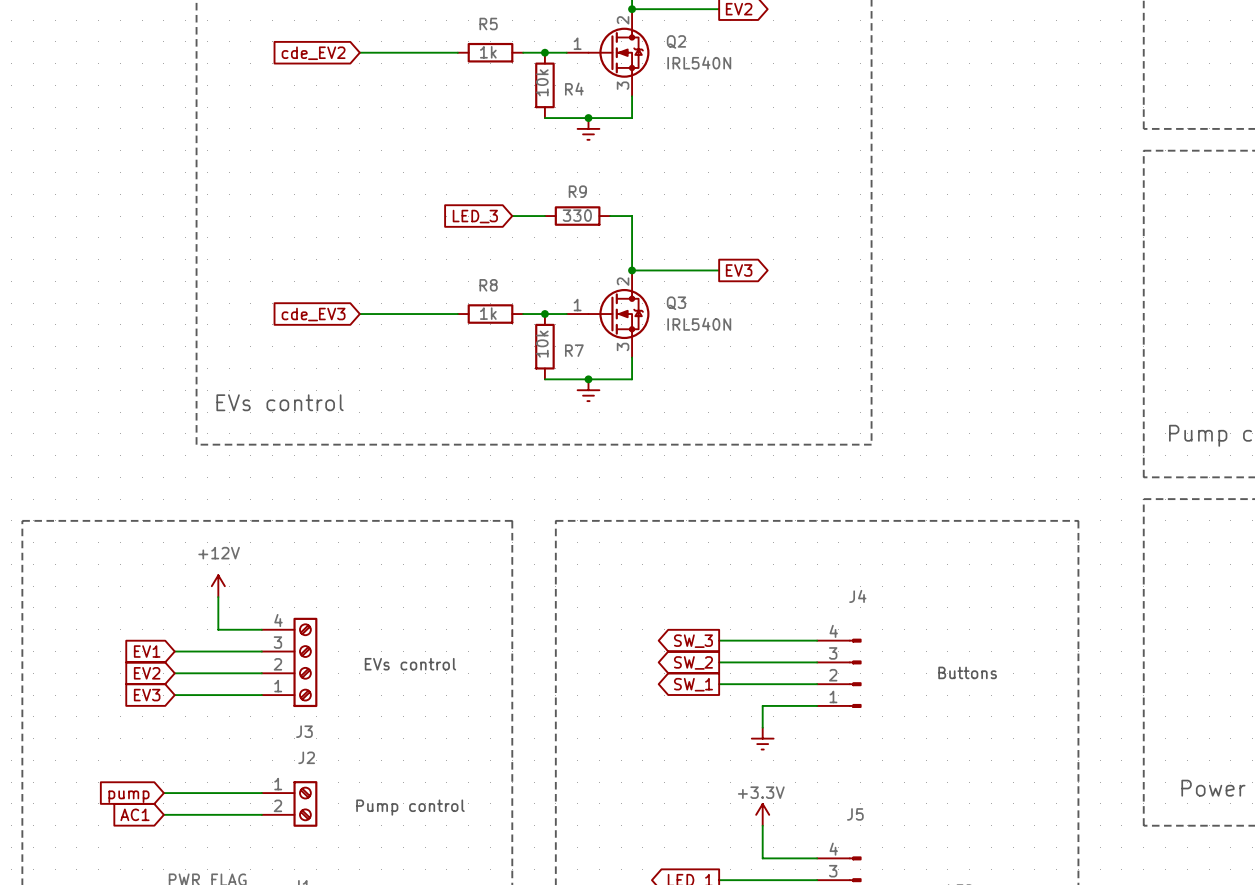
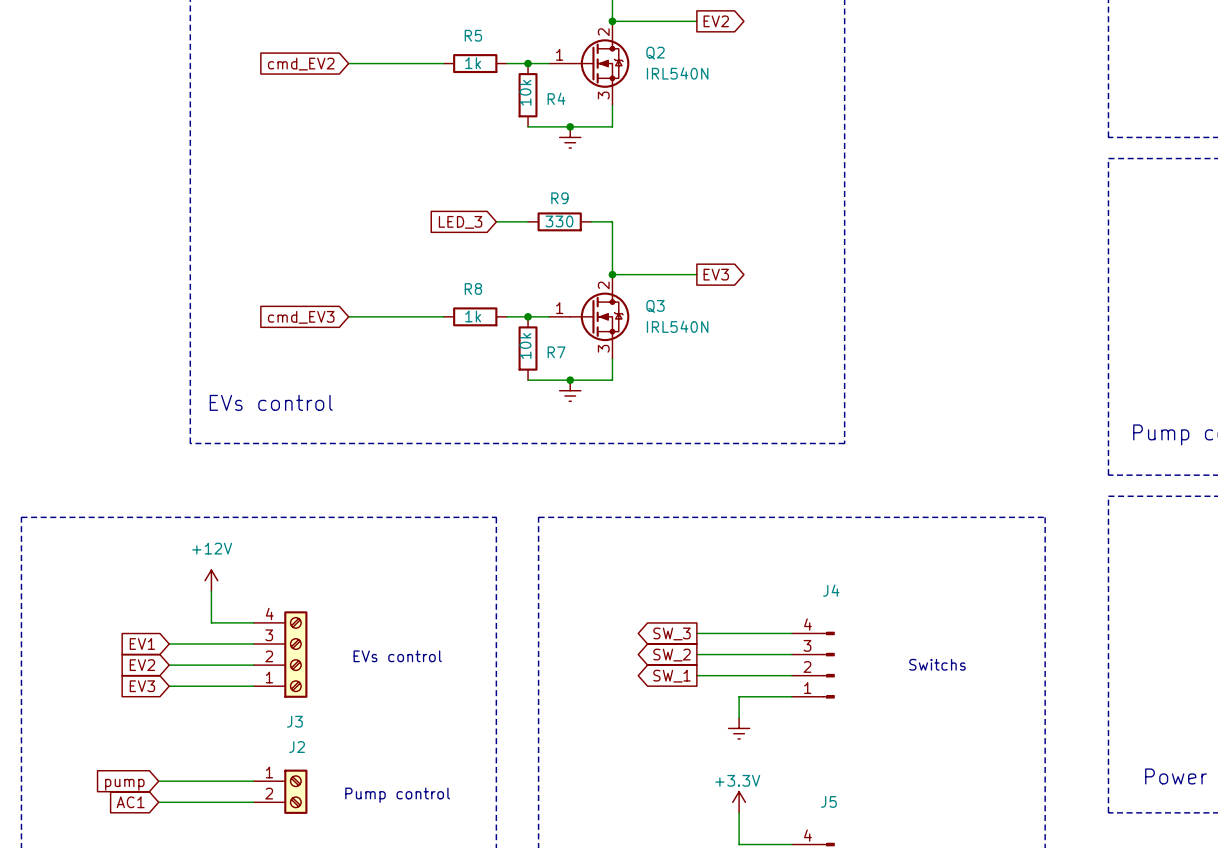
global label: cde_EV2 (313, 53) -> cmd_EV2 (301, 64)
global label: cde_EV3 (313, 314) -> cmd_EV3 (301, 317)
text: Buttons (967, 672) -> Switchs (937, 664)

